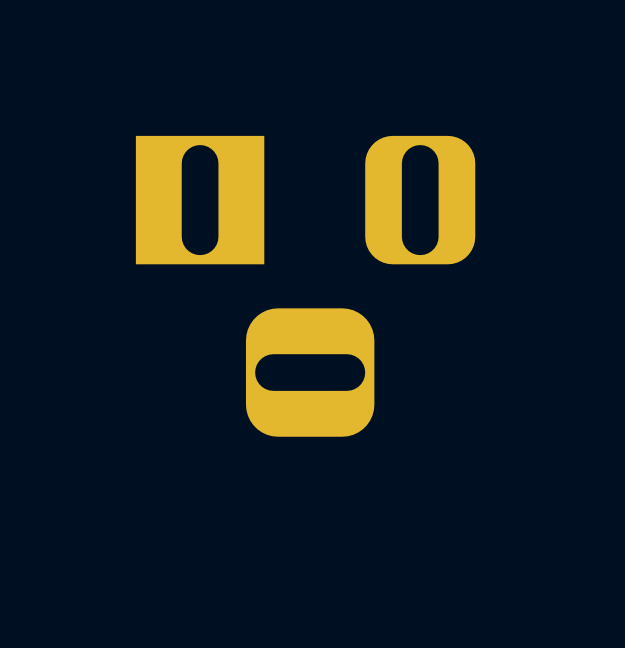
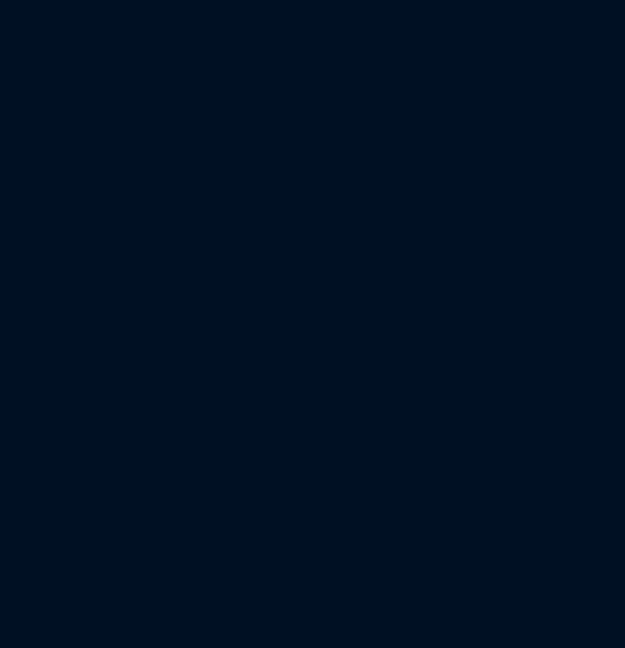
part: (305, 286) -> none

